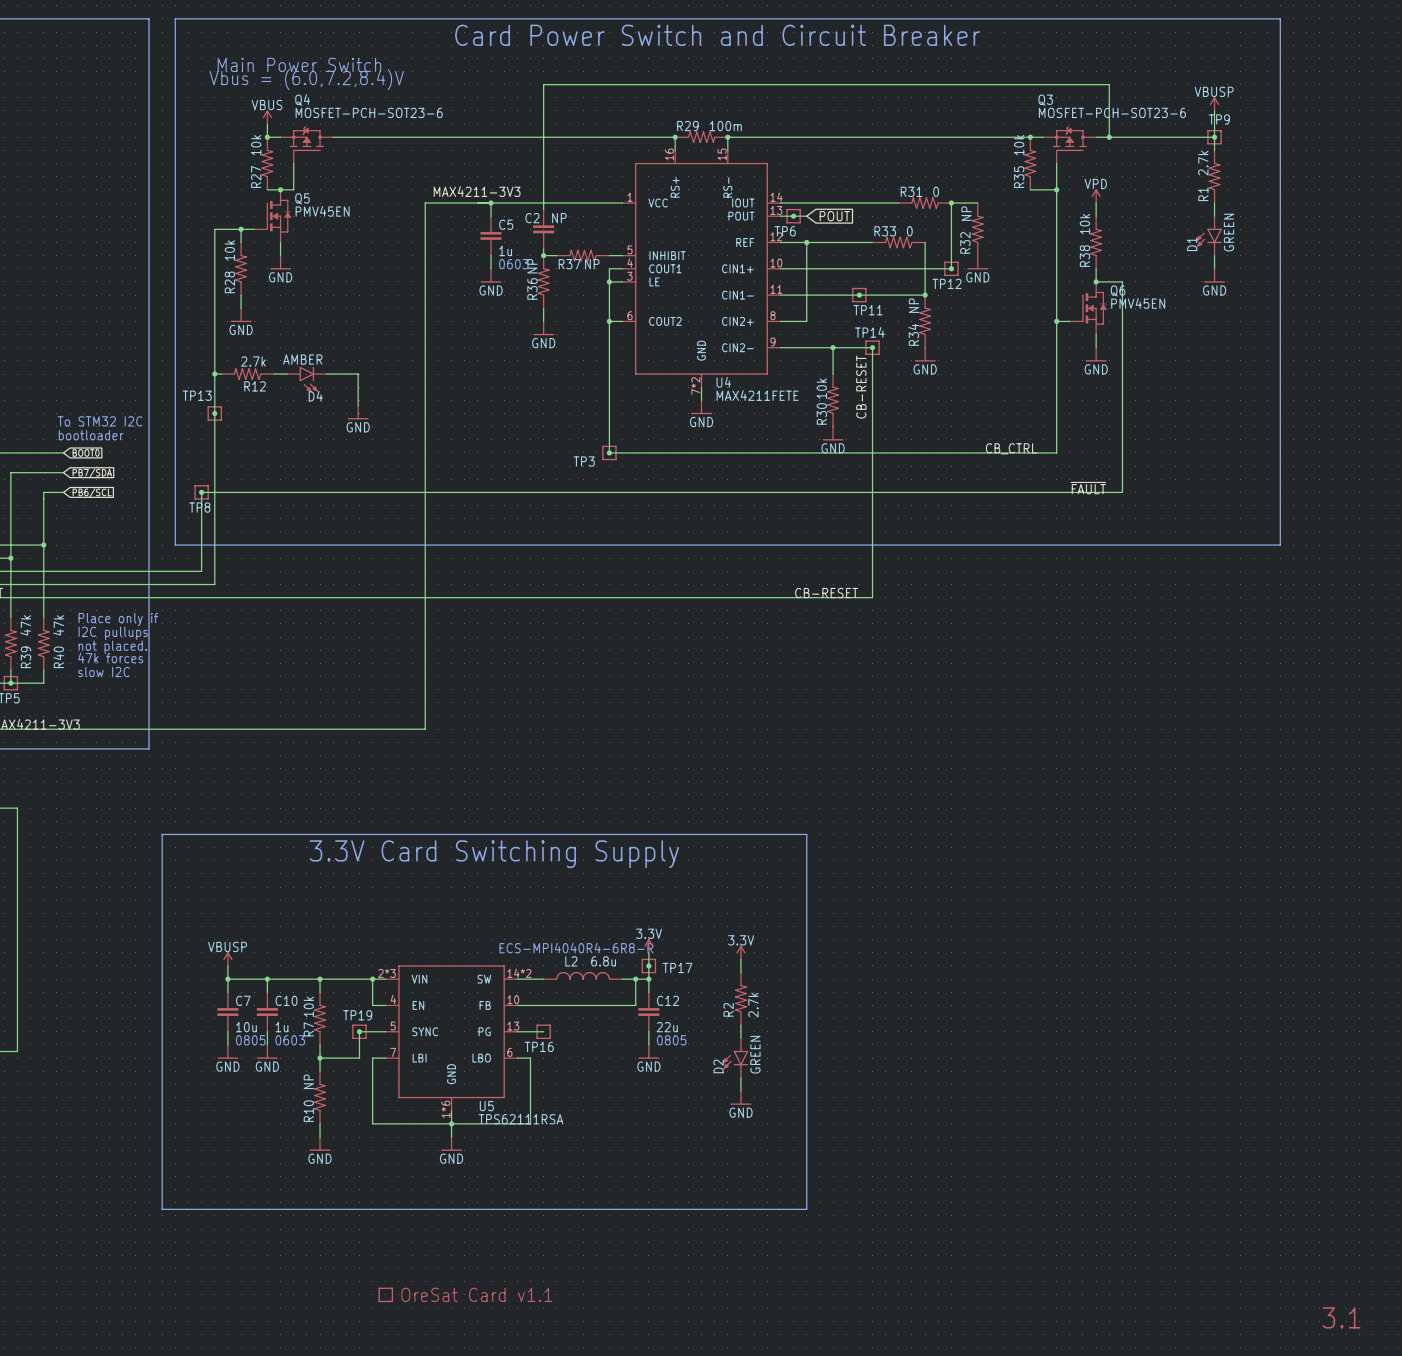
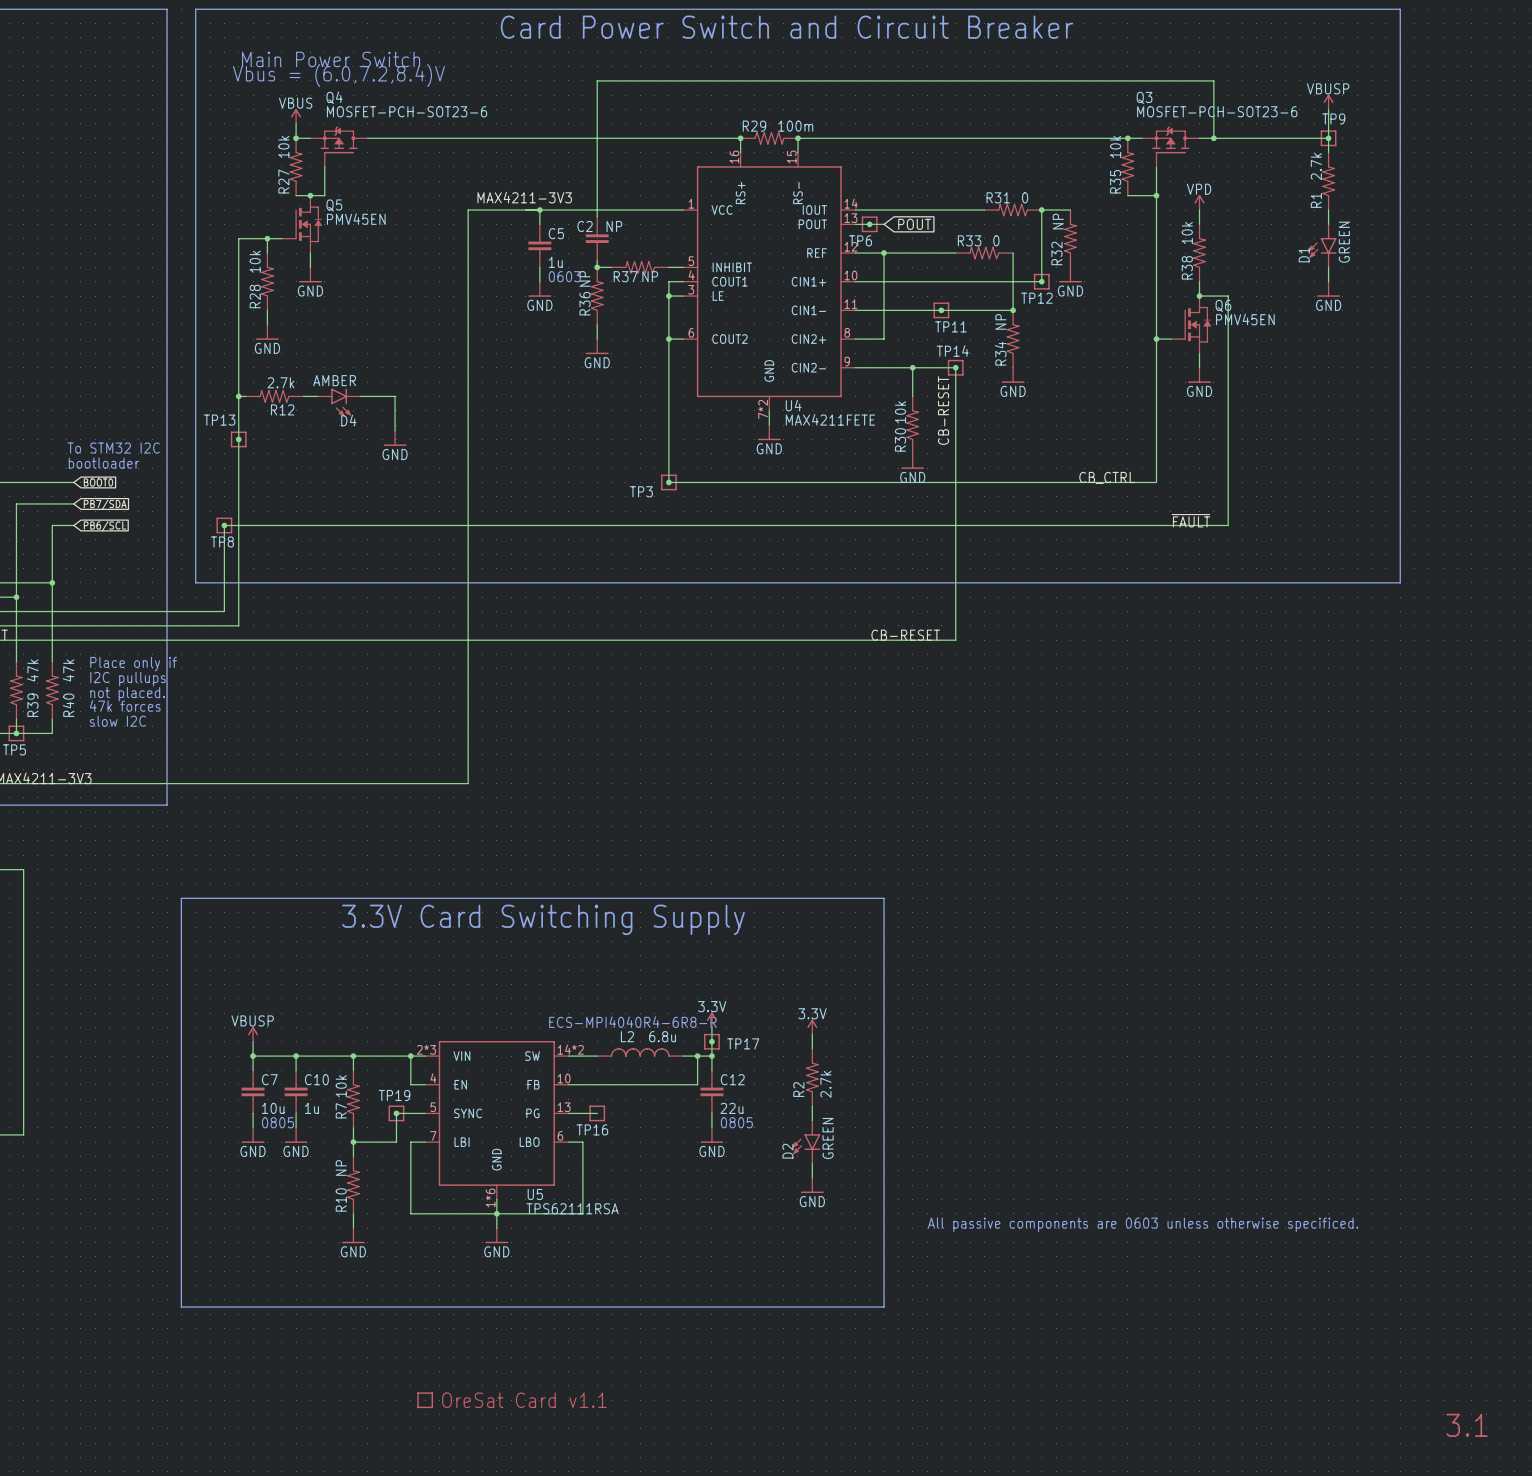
text: 0603 (290, 1040) -> none
text: none -> All passive components are 0603 unless otherwise specificed. (1143, 1224)

